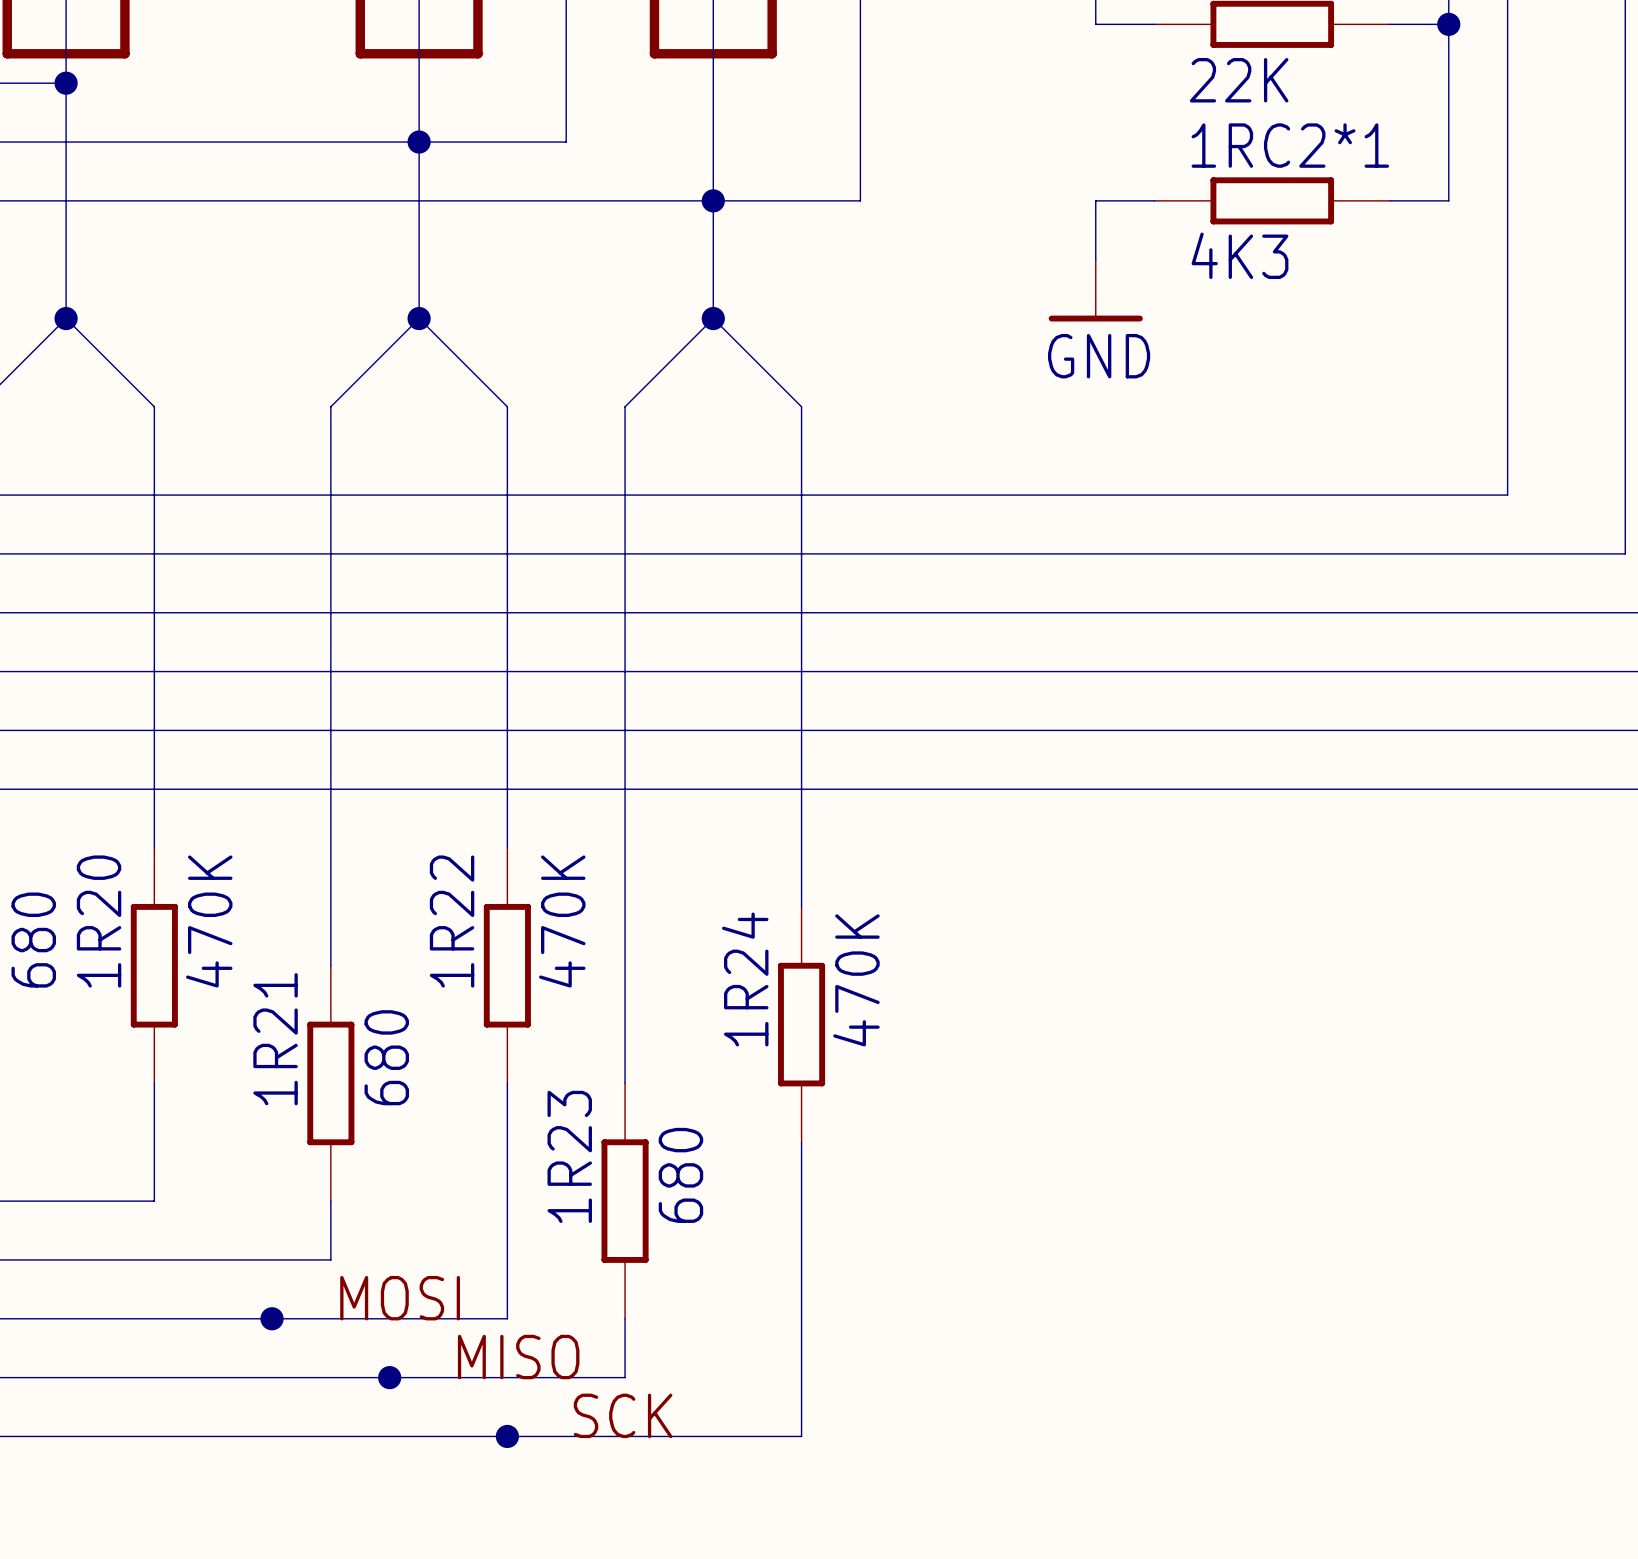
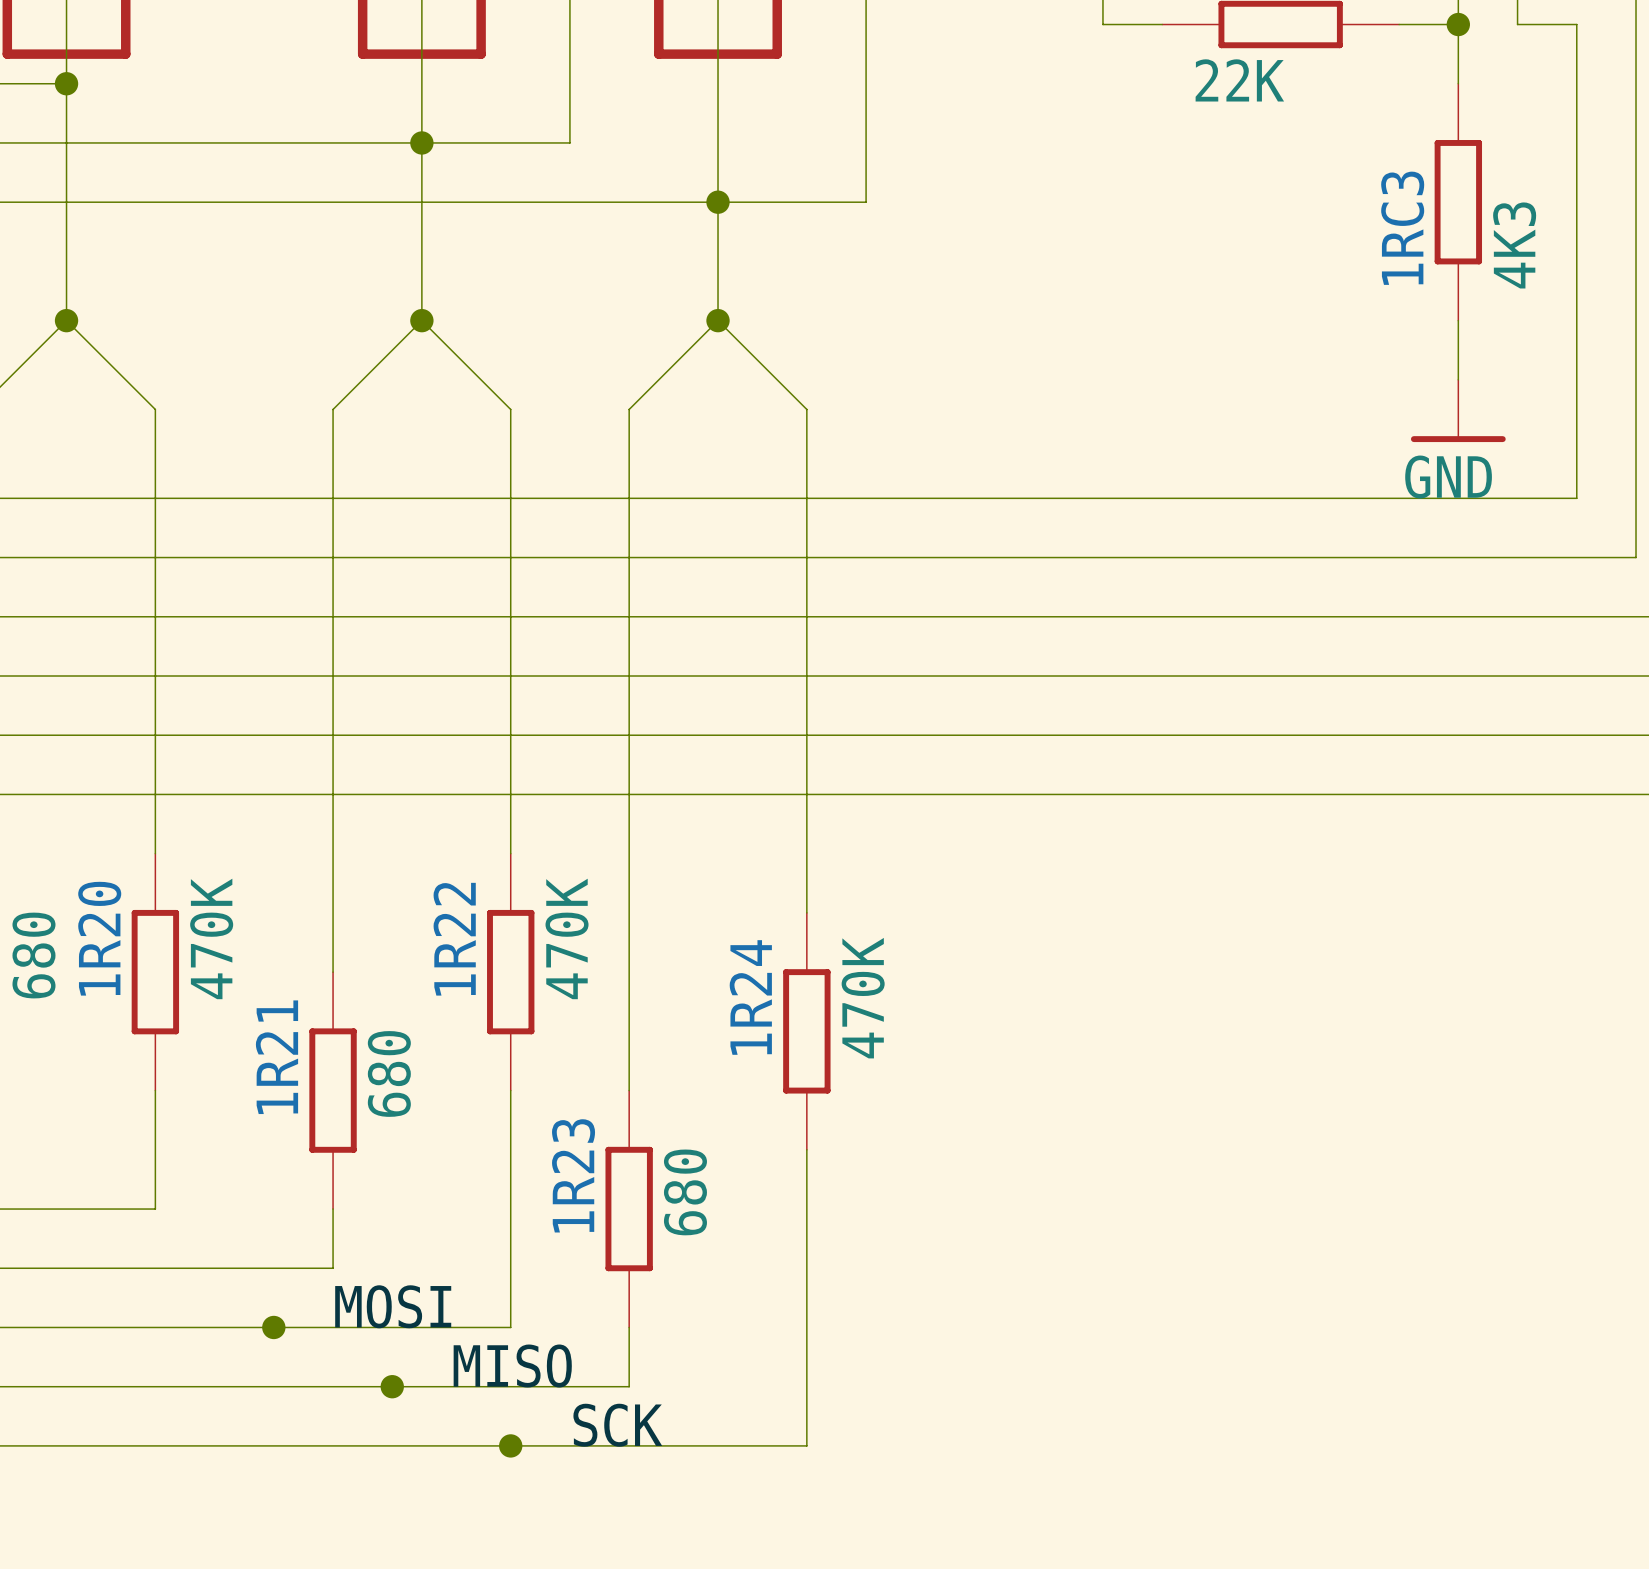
wire: (1507, 24) (1507, 495) -> (1517, 24) (1576, 24) (1576, 498) (1517, 498)
wire: (1448, 83) (1448, 200) (1389, 200) -> none
wire: (1154, 200) (1095, 200) (1095, 259) -> none
1RC2*1: 4K3 (1272, 200) -> none
1RC3: none -> 4K3 (1458, 202)
power symbol position: GND (1095, 290) -> GND (1458, 410)
wire: none -> (1458, 320) (1458, 379)

